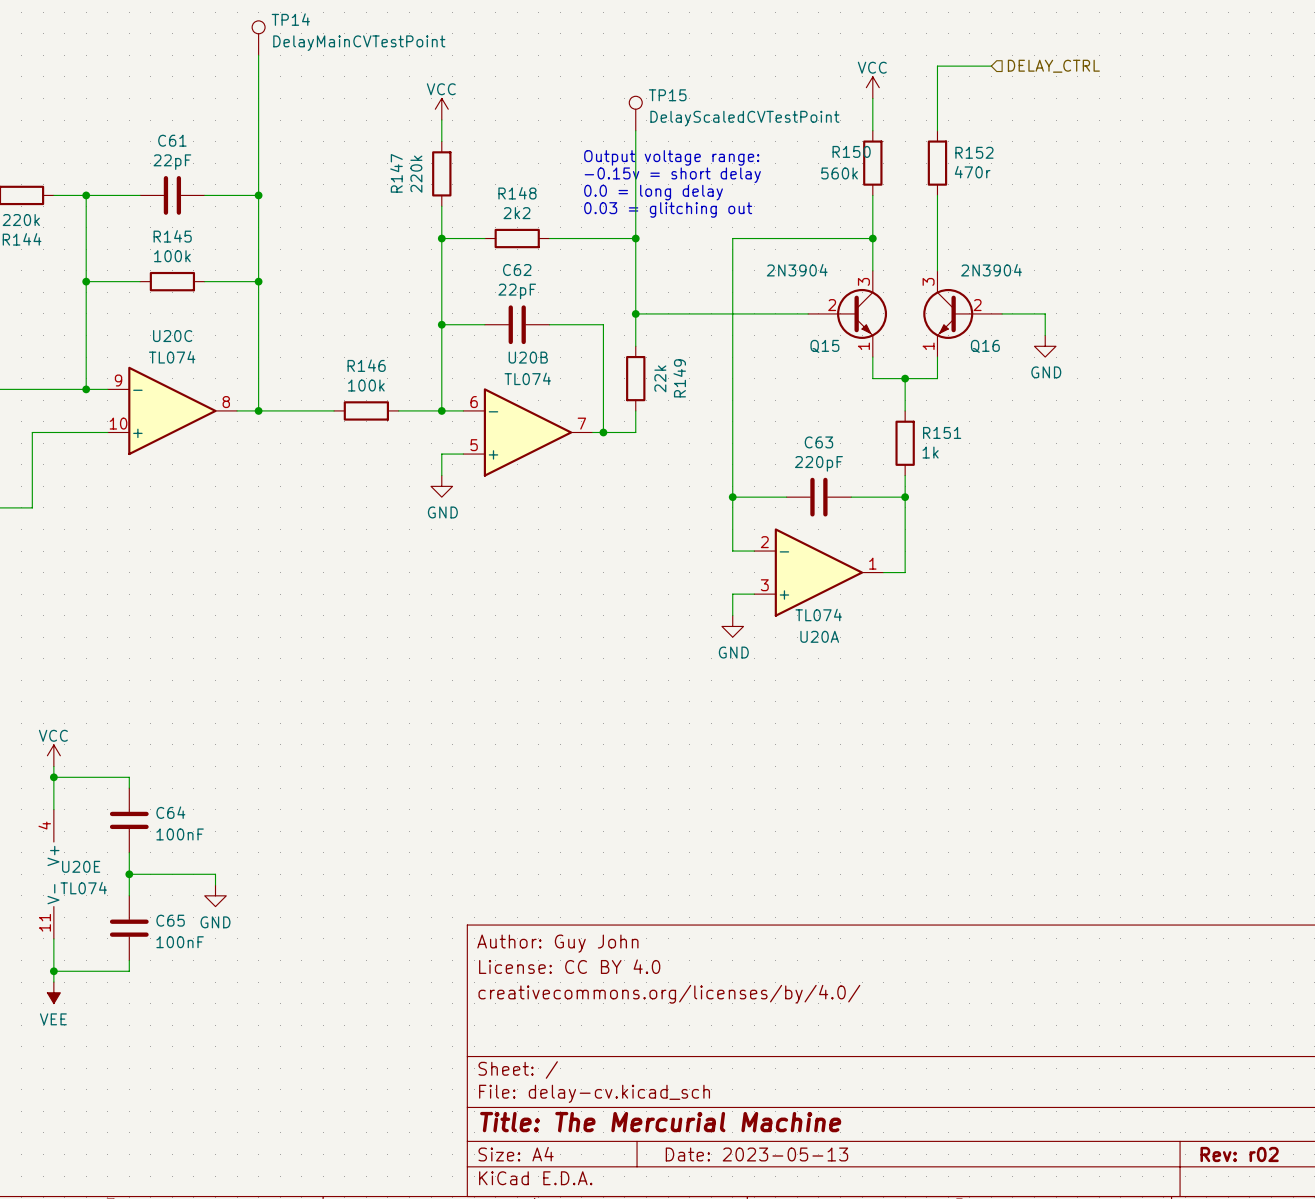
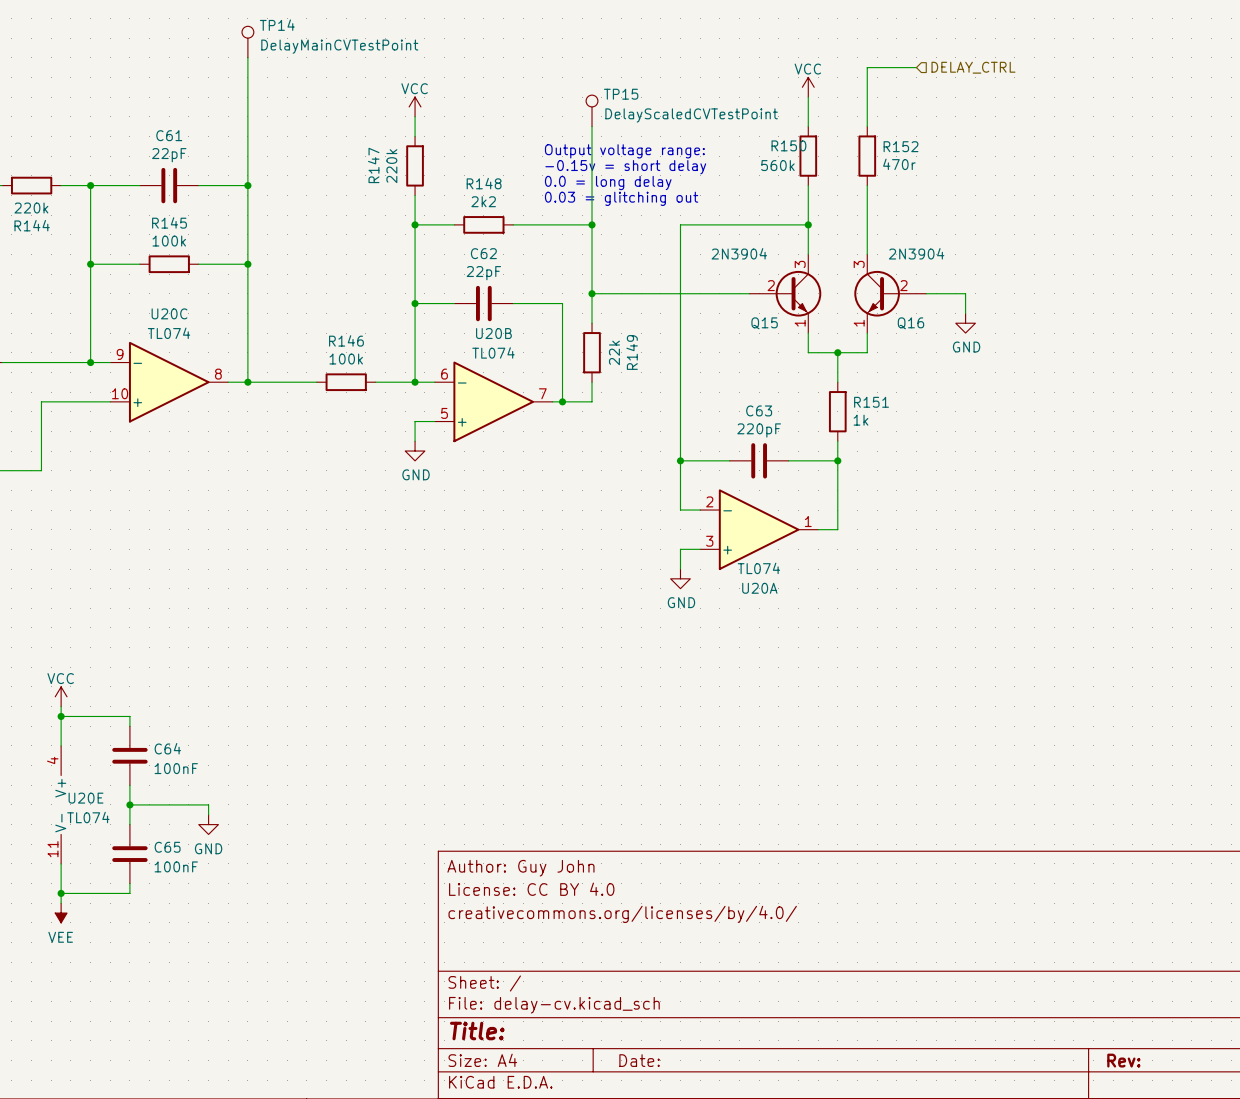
title block: Title: The Mercurial Machine (660, 1122) -> Title: (477, 1031)
title block: Date: 2023-05-13 (756, 1154) -> Date: (639, 1060)
title block: Rev: r02 (1239, 1154) -> Rev: (1123, 1060)

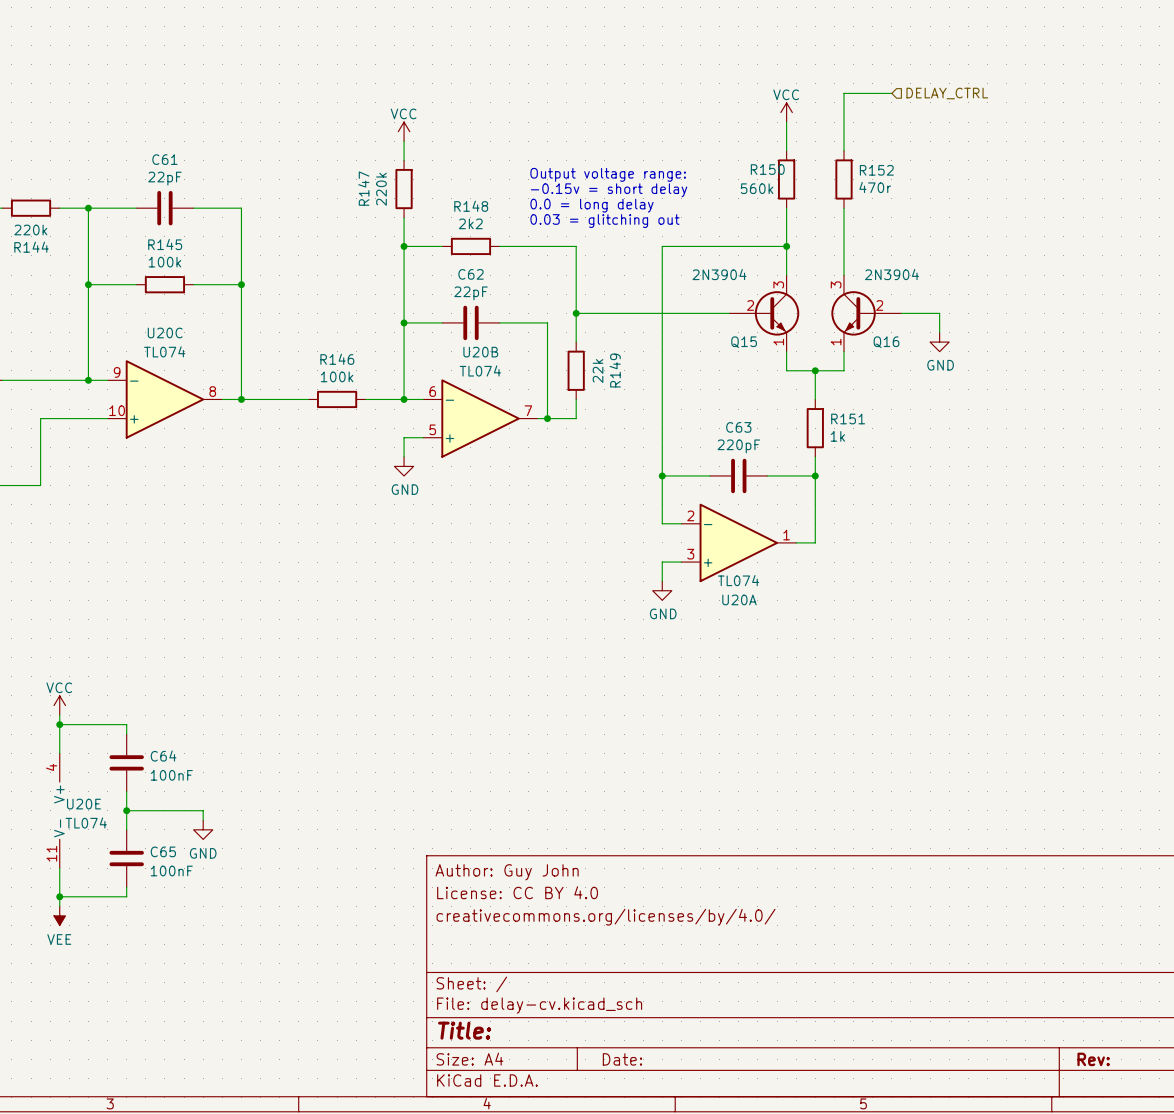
TP14: DelayMainCVTestPoint (247, 42) -> none
wire: (247, 57) (247, 185) -> none
TP15: DelayScaledCVTestPoint (592, 110) -> none
wire: (592, 126) (592, 224) -> none
junction: (247, 185) -> none
junction: (592, 224) -> none

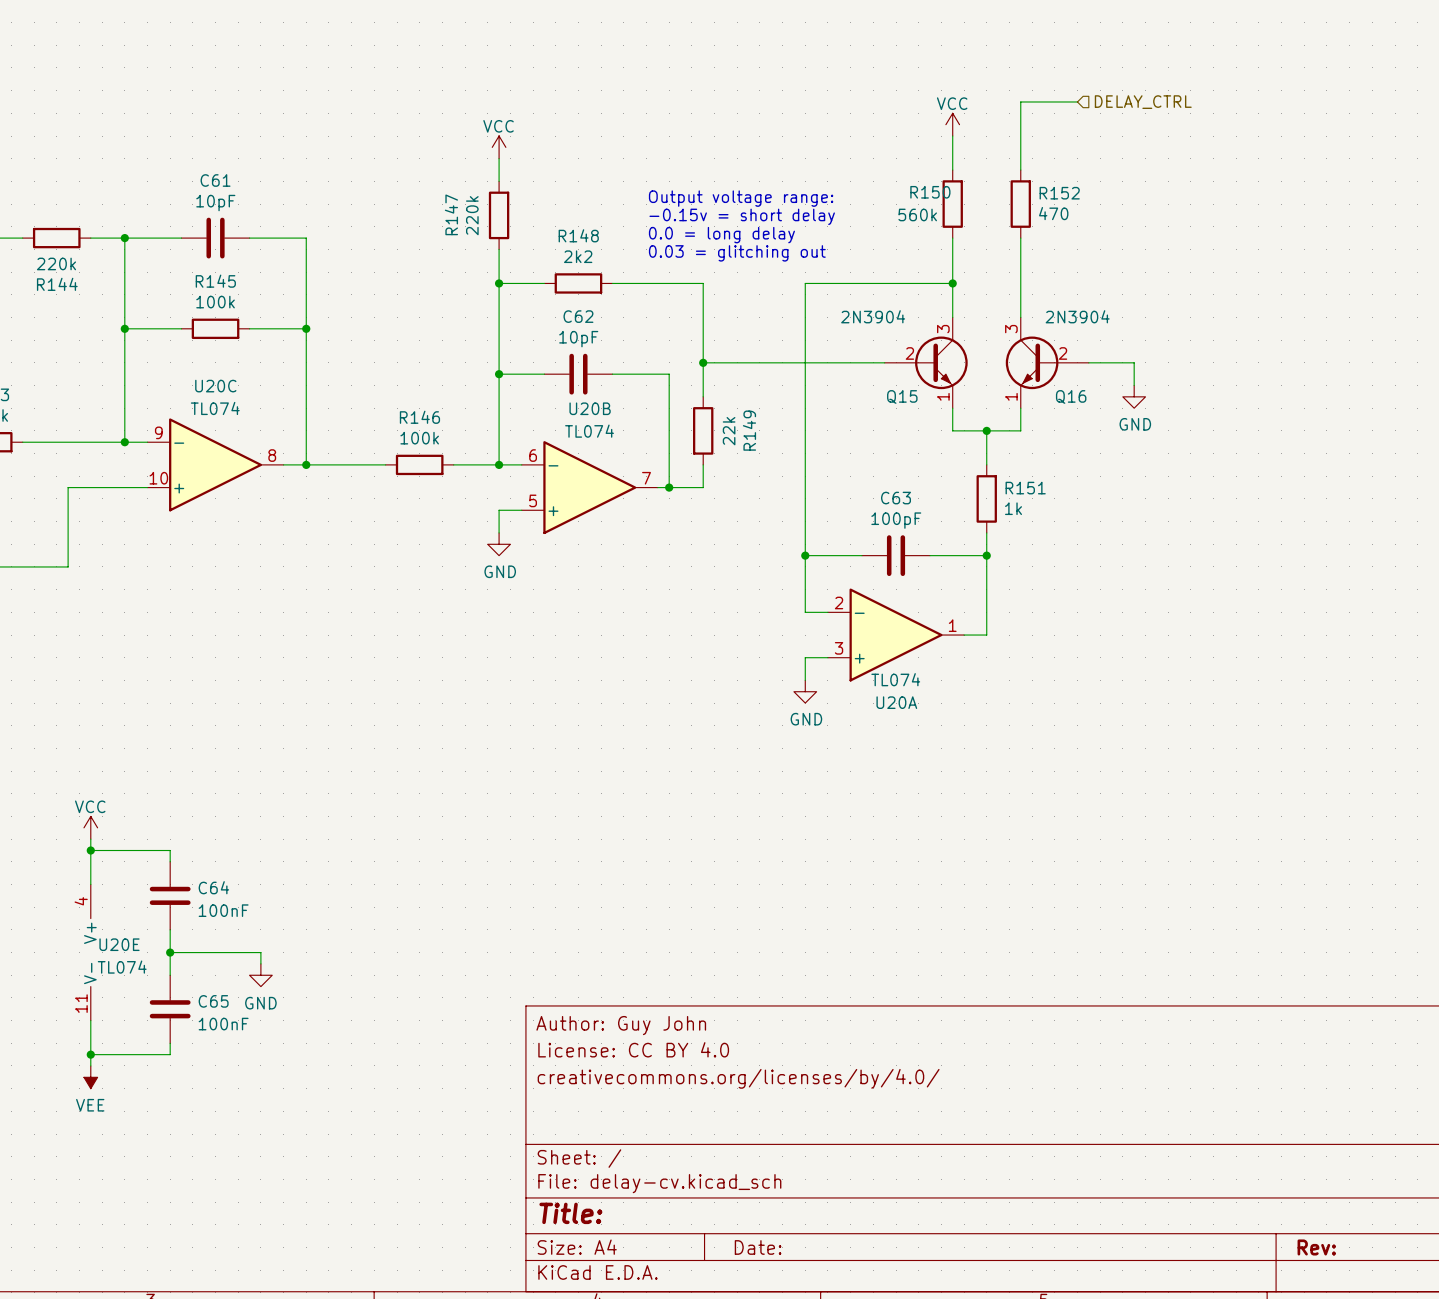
C61 value: 22pF (164, 178) -> 10pF (215, 203)
R152 value: 470r (875, 187) -> 470 (1053, 213)
C62 value: 22pF (470, 293) -> 10pF (578, 339)
C63 value: 220pF (738, 446) -> 100pF (896, 520)

